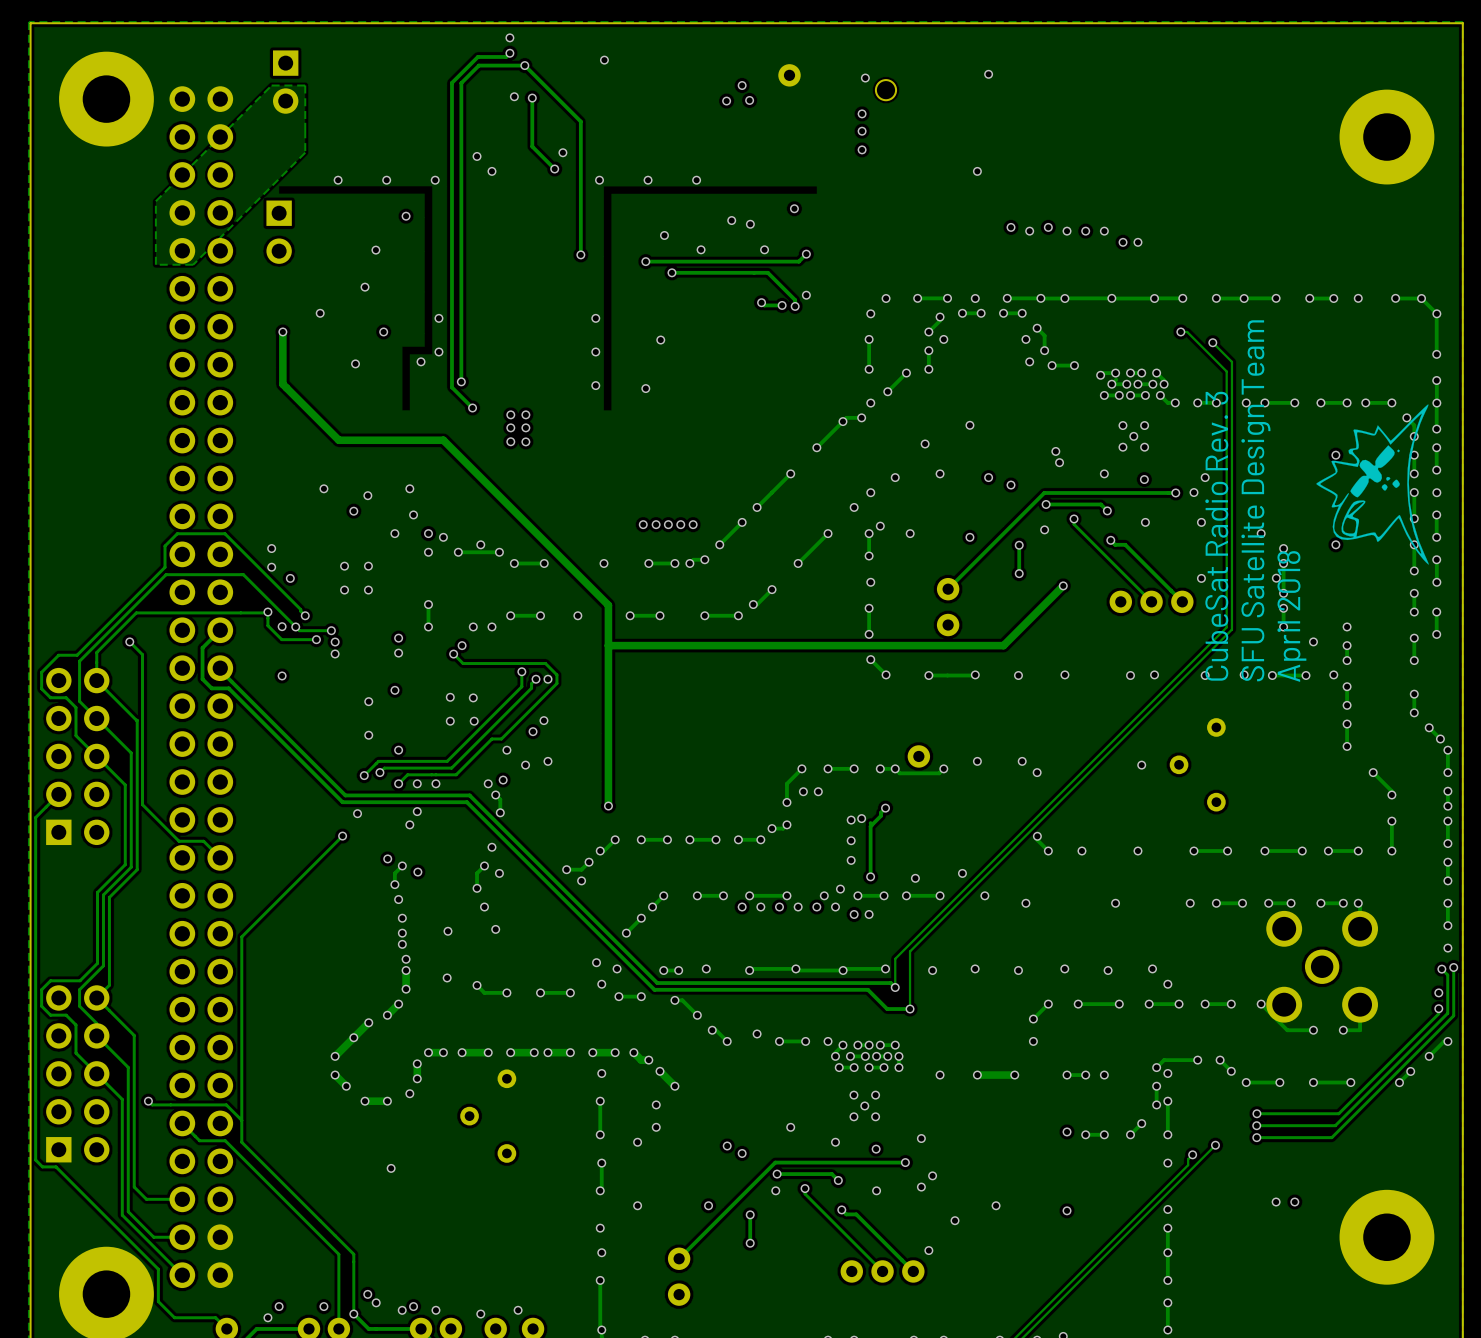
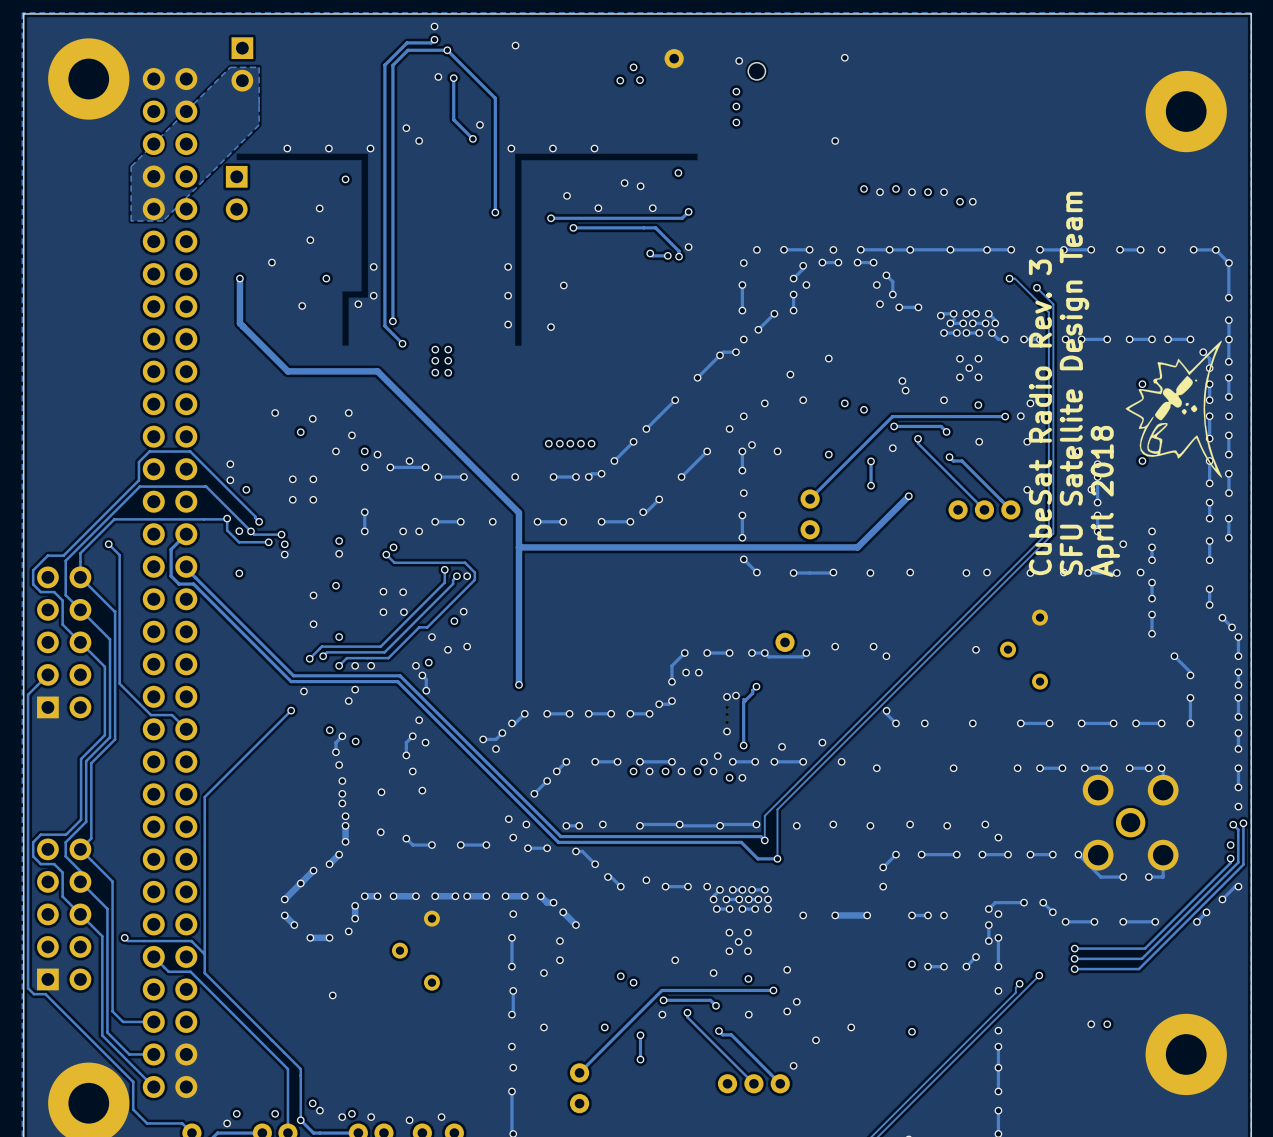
via: (851, 840) -> none
part: none -> (727, 714)

